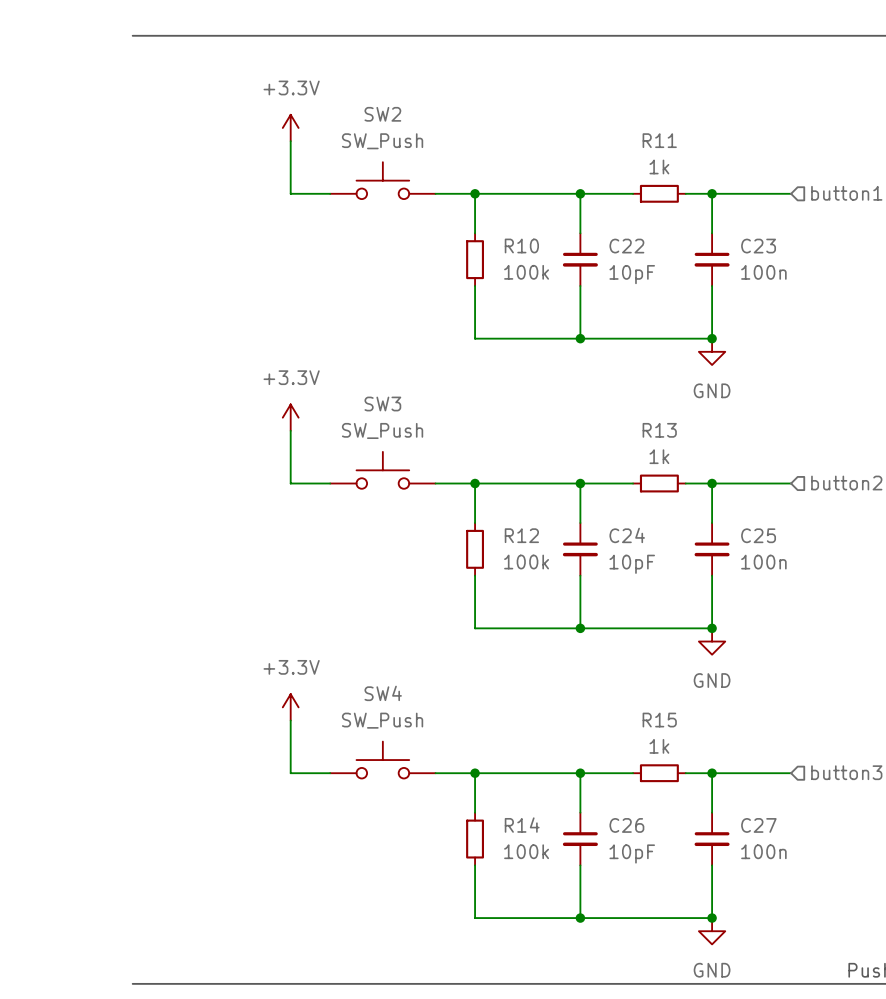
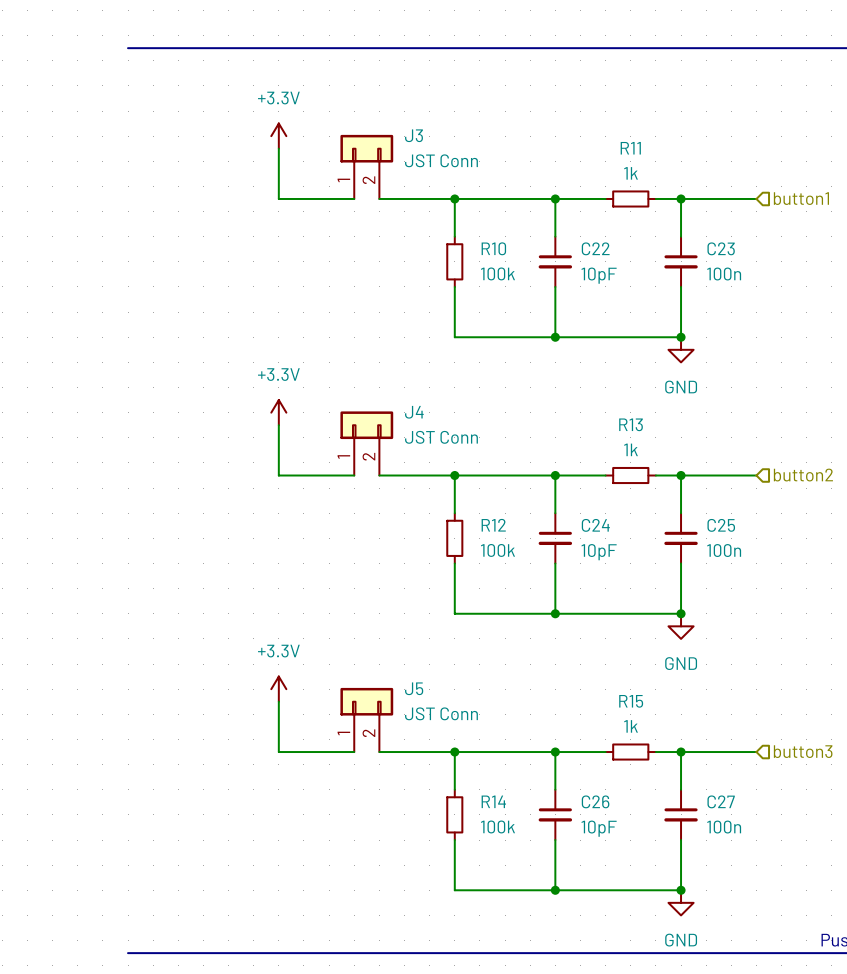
J3: none -> JST Conn (366, 166)
SW2: SW_Push (382, 180) -> none
J4: none -> JST Conn (366, 443)
SW3: SW_Push (382, 470) -> none
J5: none -> JST Conn (366, 719)
SW4: SW_Push (382, 760) -> none

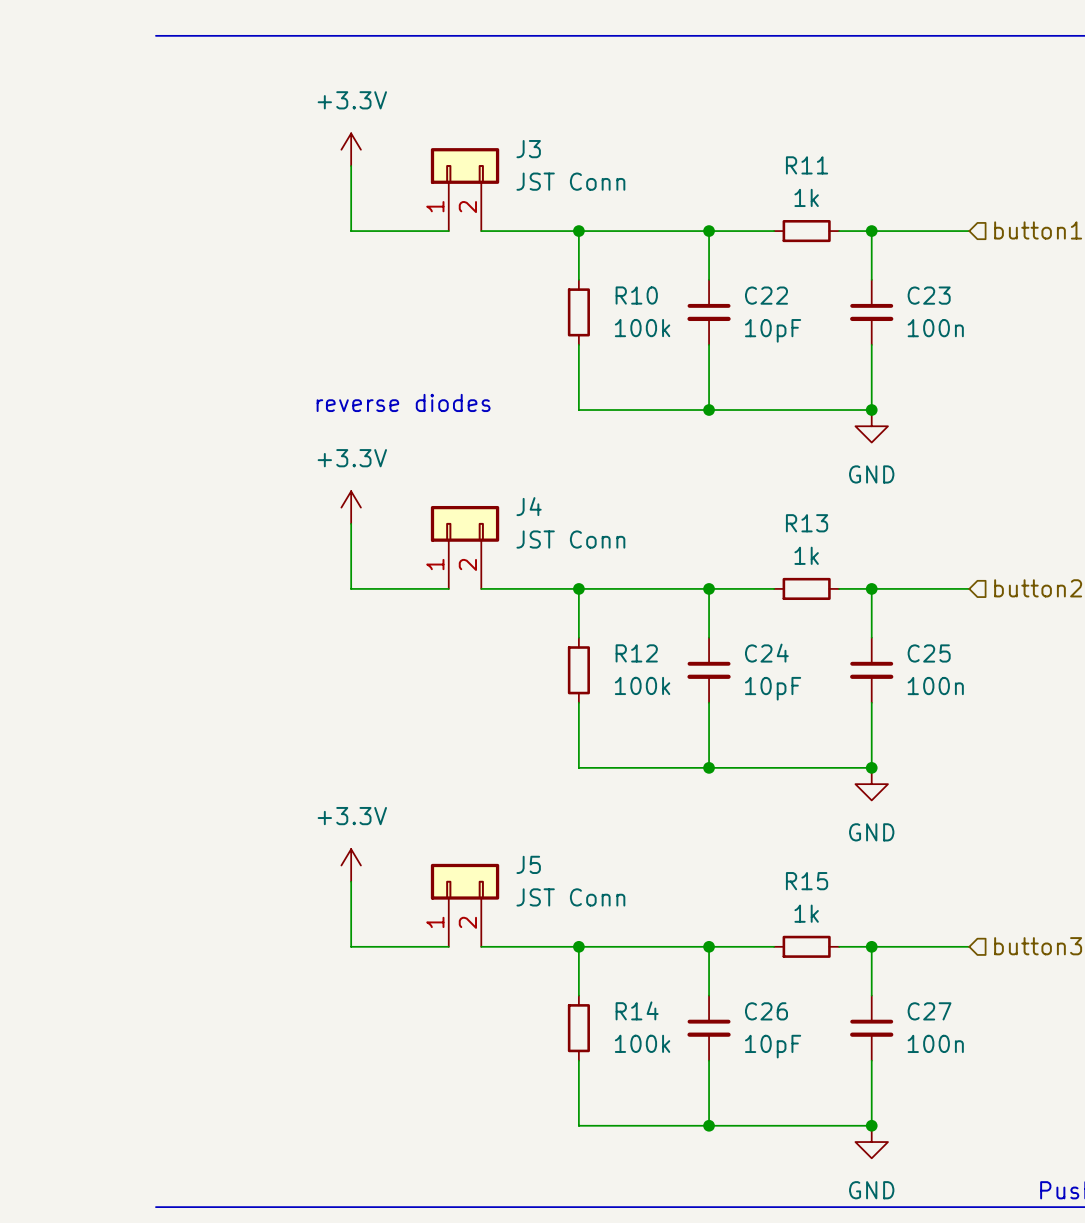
text: none -> reverse diodes (403, 402)

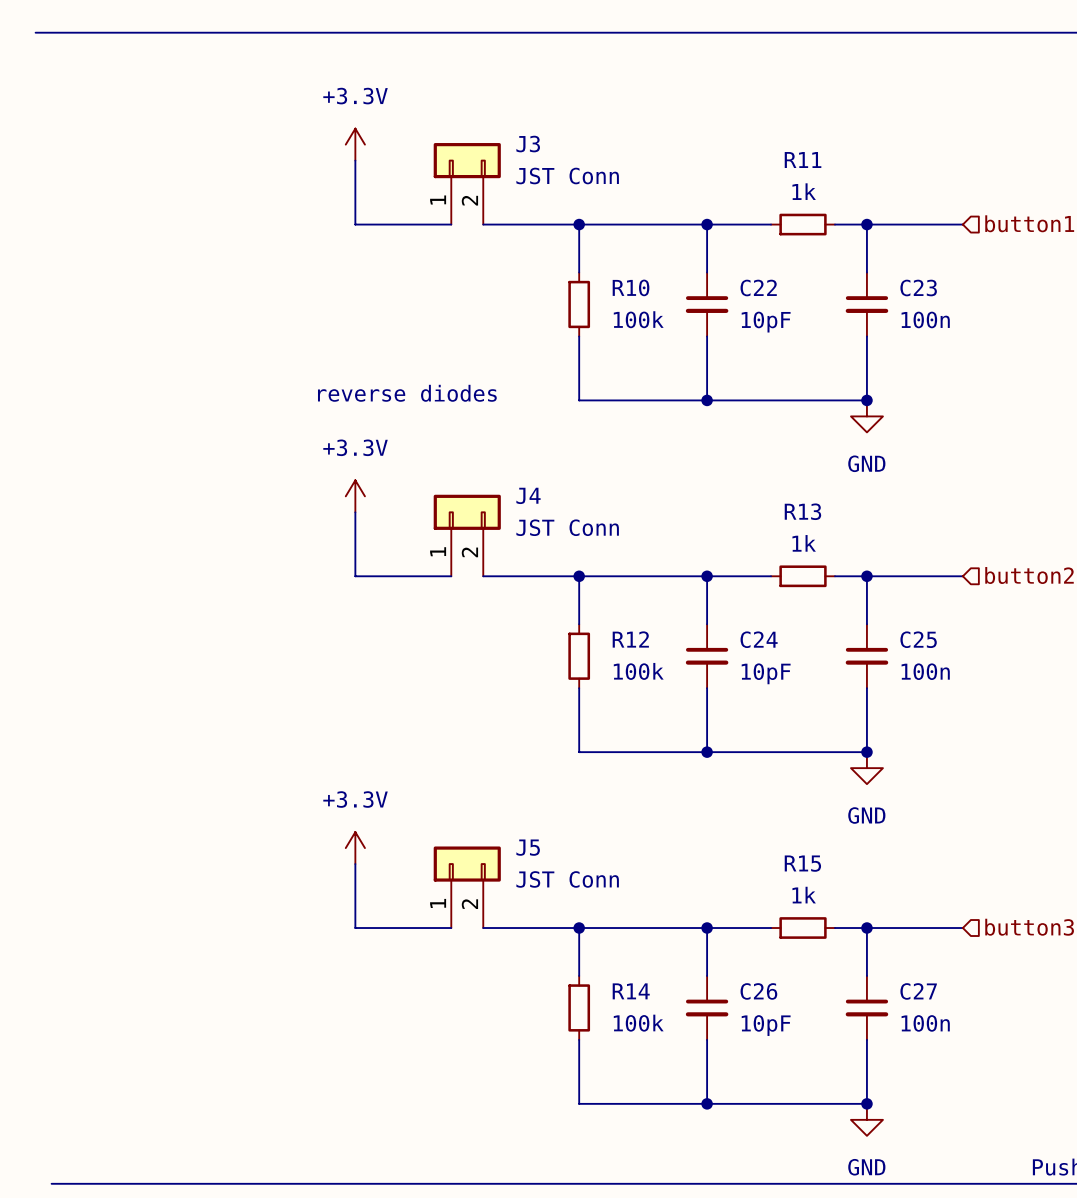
line: none -> (35, 32) (163, 32)
line: none -> (51, 1183) (163, 1183)

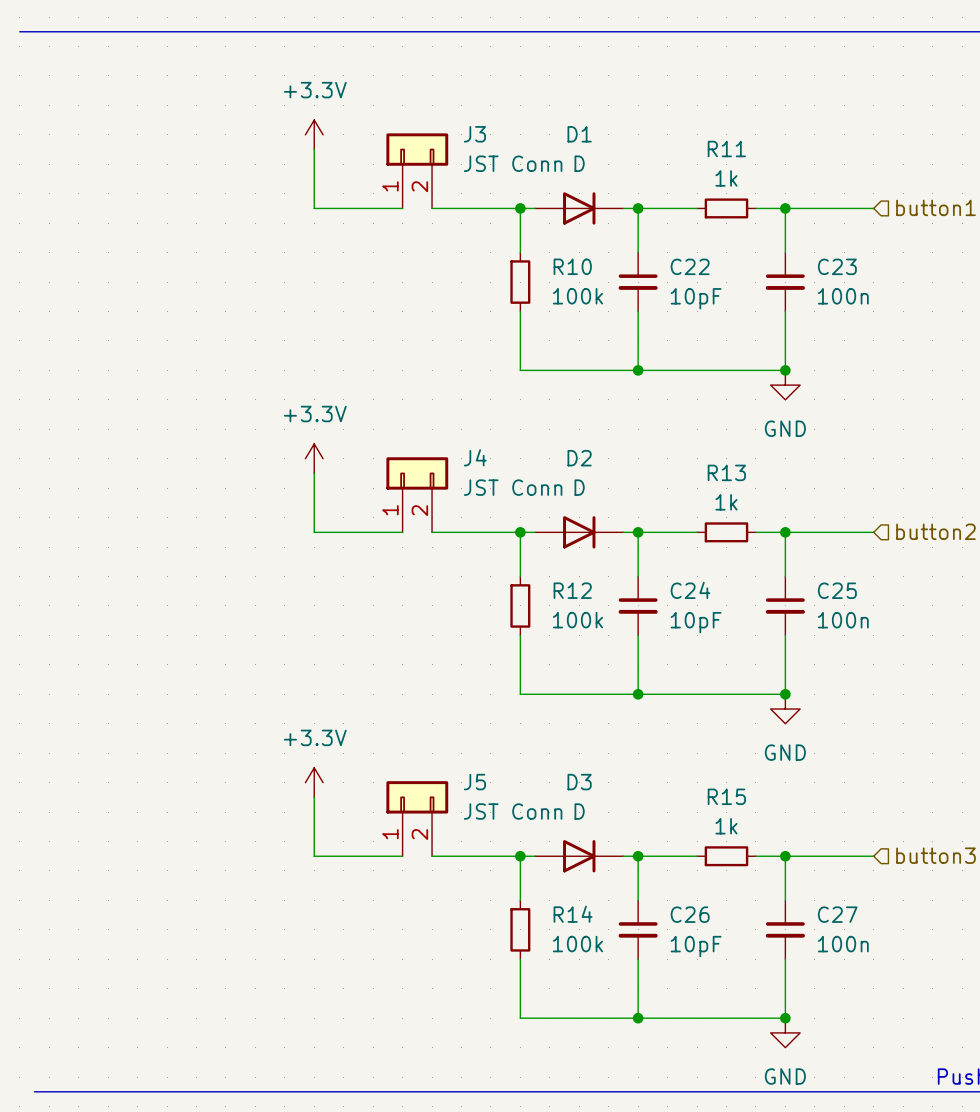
D1: none -> D (579, 208)
text: reverse diodes (407, 393) -> none
D2: none -> D (579, 532)
D3: none -> D (579, 856)

